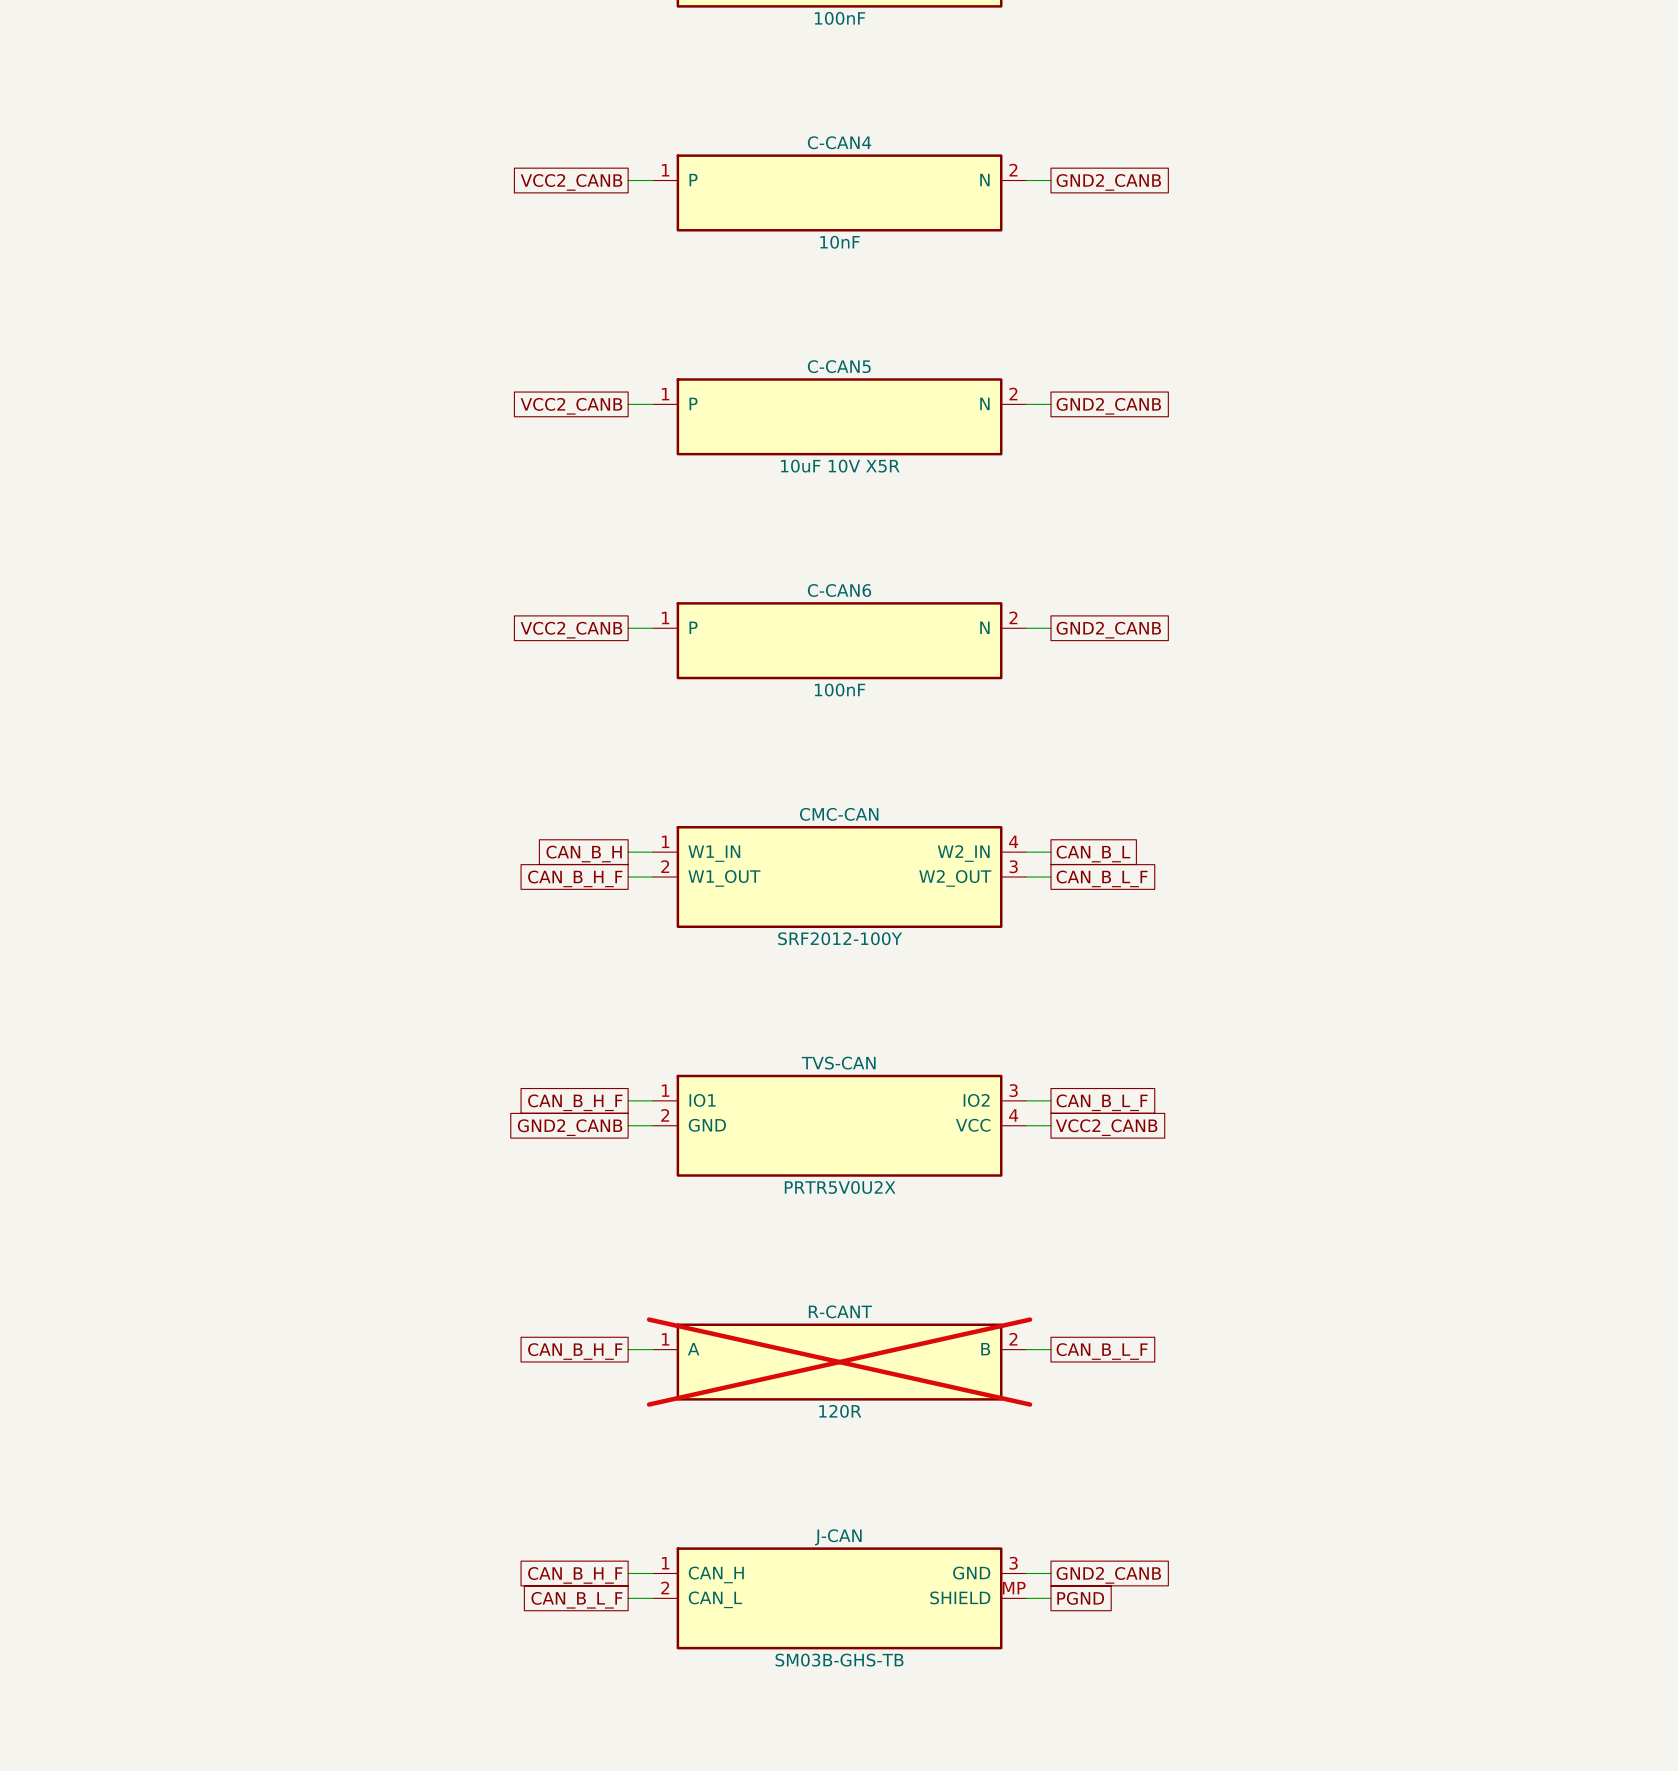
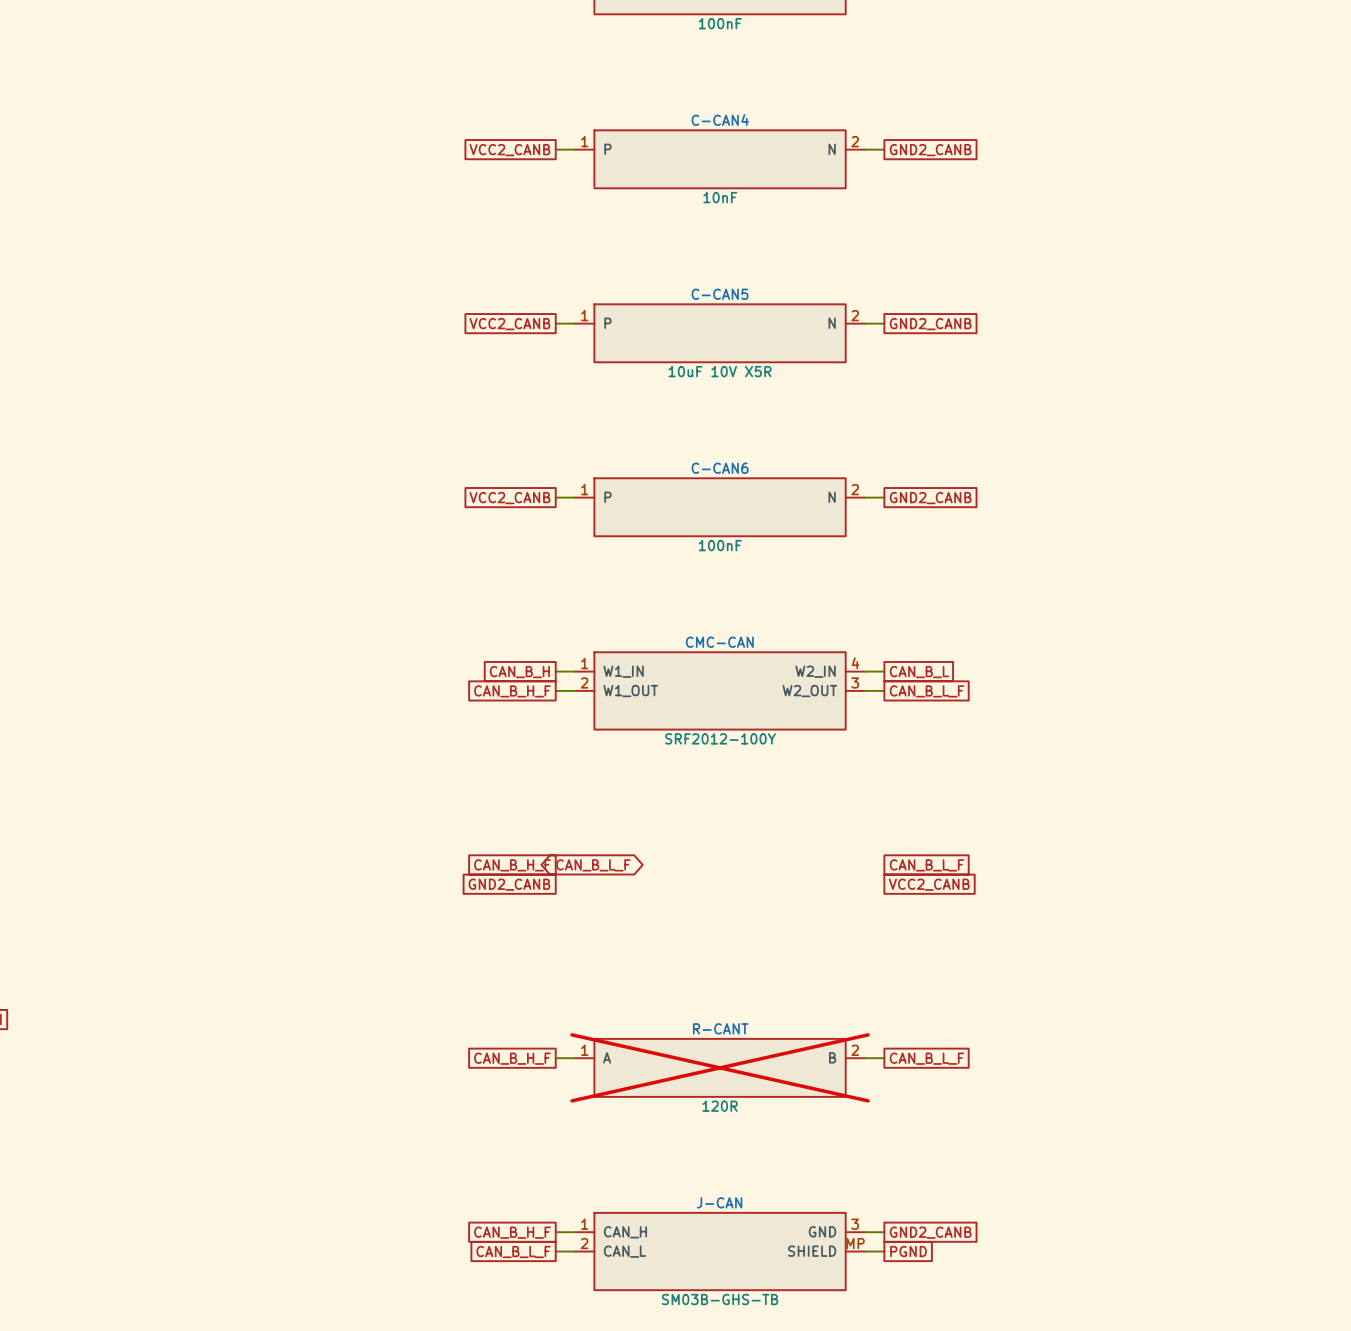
wire: (628, 1100) (653, 1100) -> none
wire: (1026, 1100) (1050, 1100) -> none
global label: none -> CAN_B_L_F (593, 865)
wire: (628, 1125) (653, 1125) -> none
TVS-CAN: PRTR5V0U2X (839, 1125) -> none
wire: (1026, 1125) (1050, 1125) -> none

